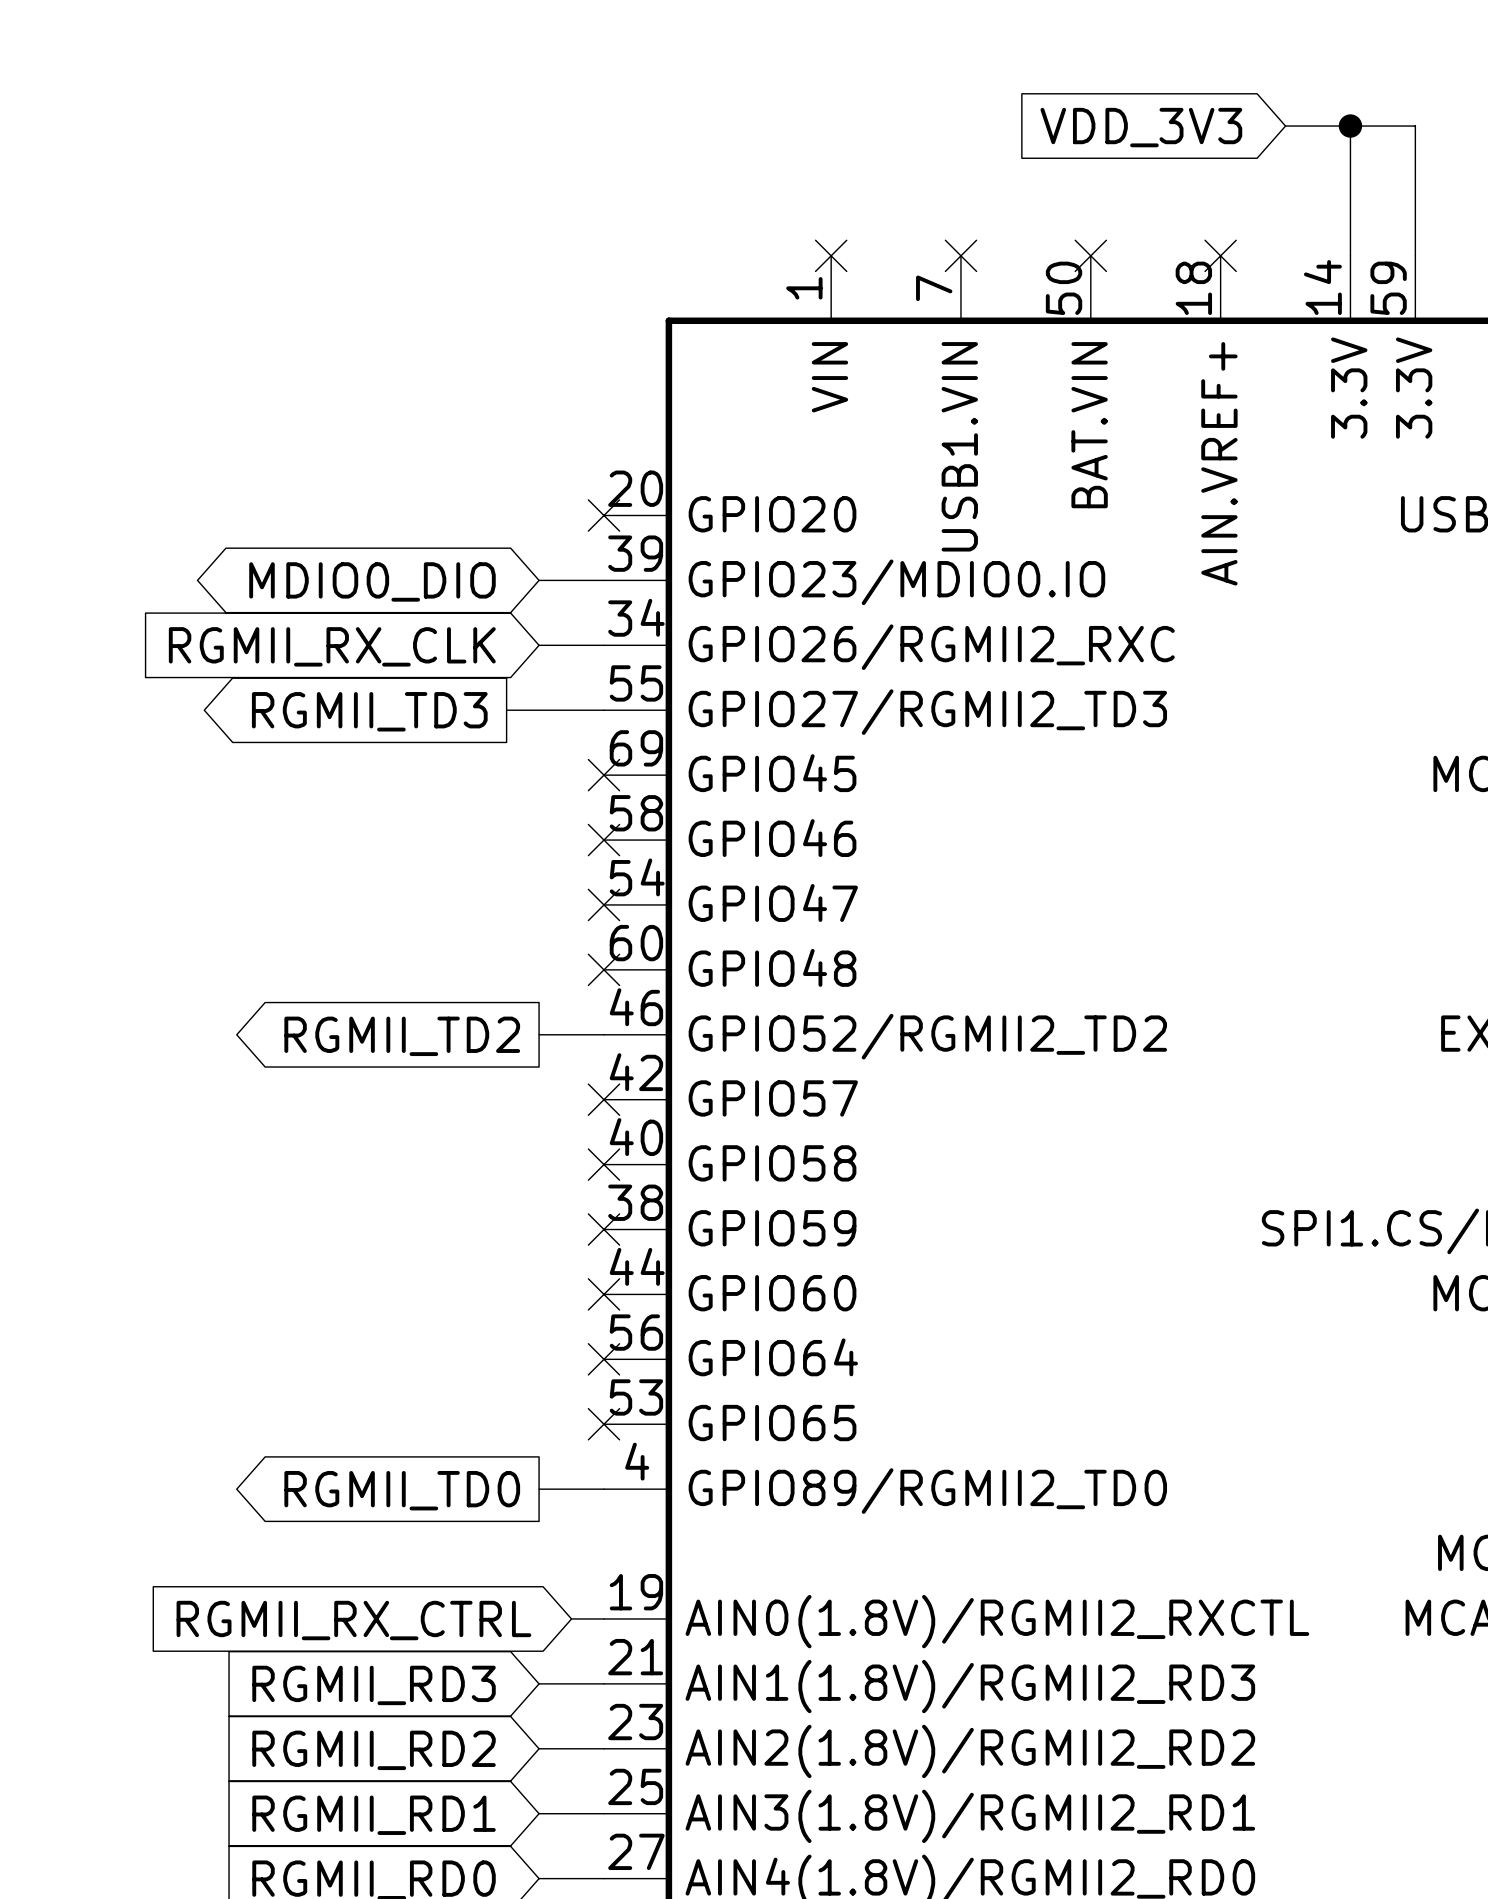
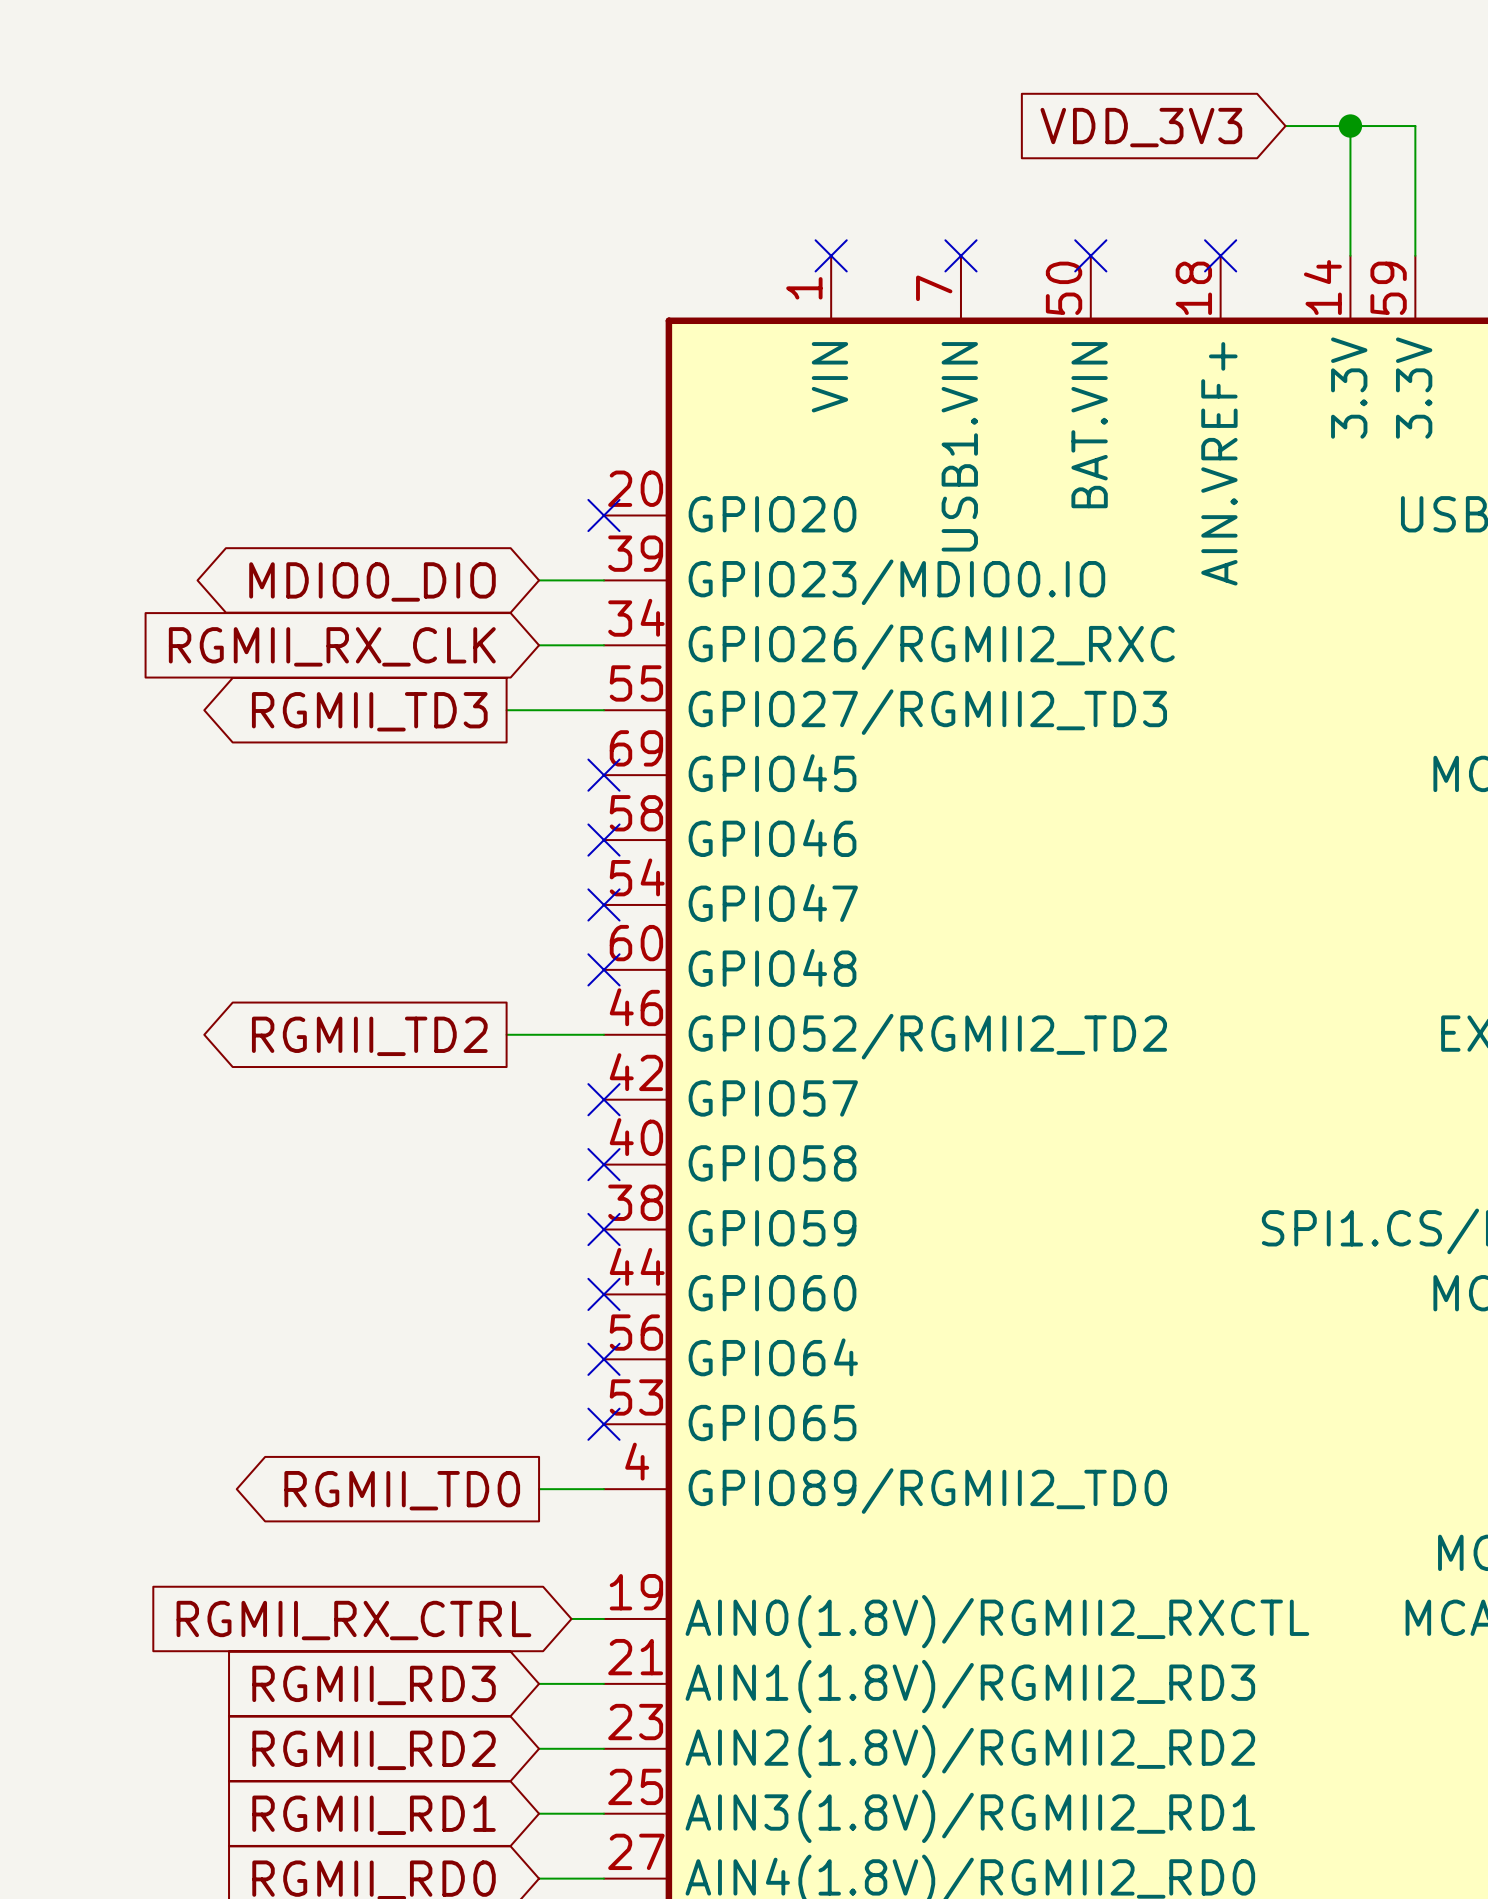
wire: none -> (506, 1034) (539, 1034)
global label position: RGMII_TD2 (402, 1036) -> RGMII_TD2 (369, 1036)

